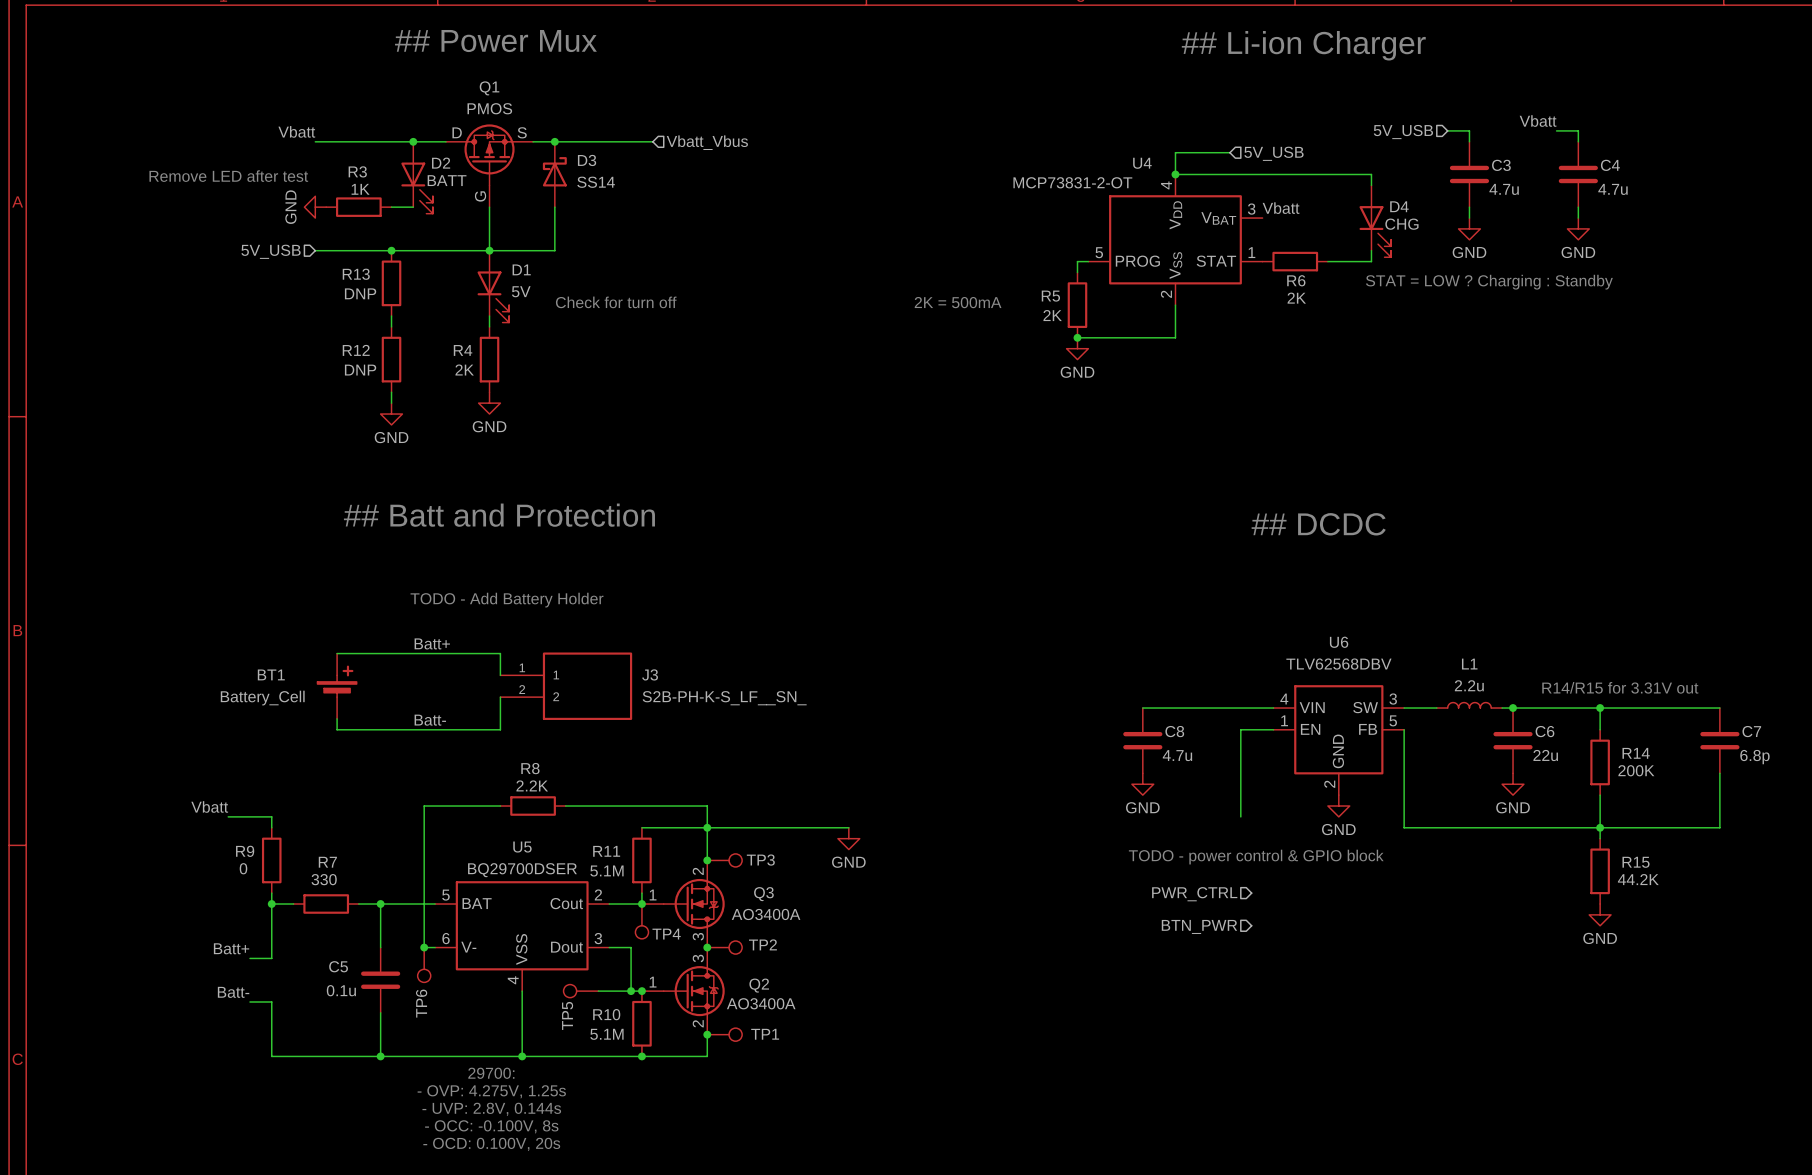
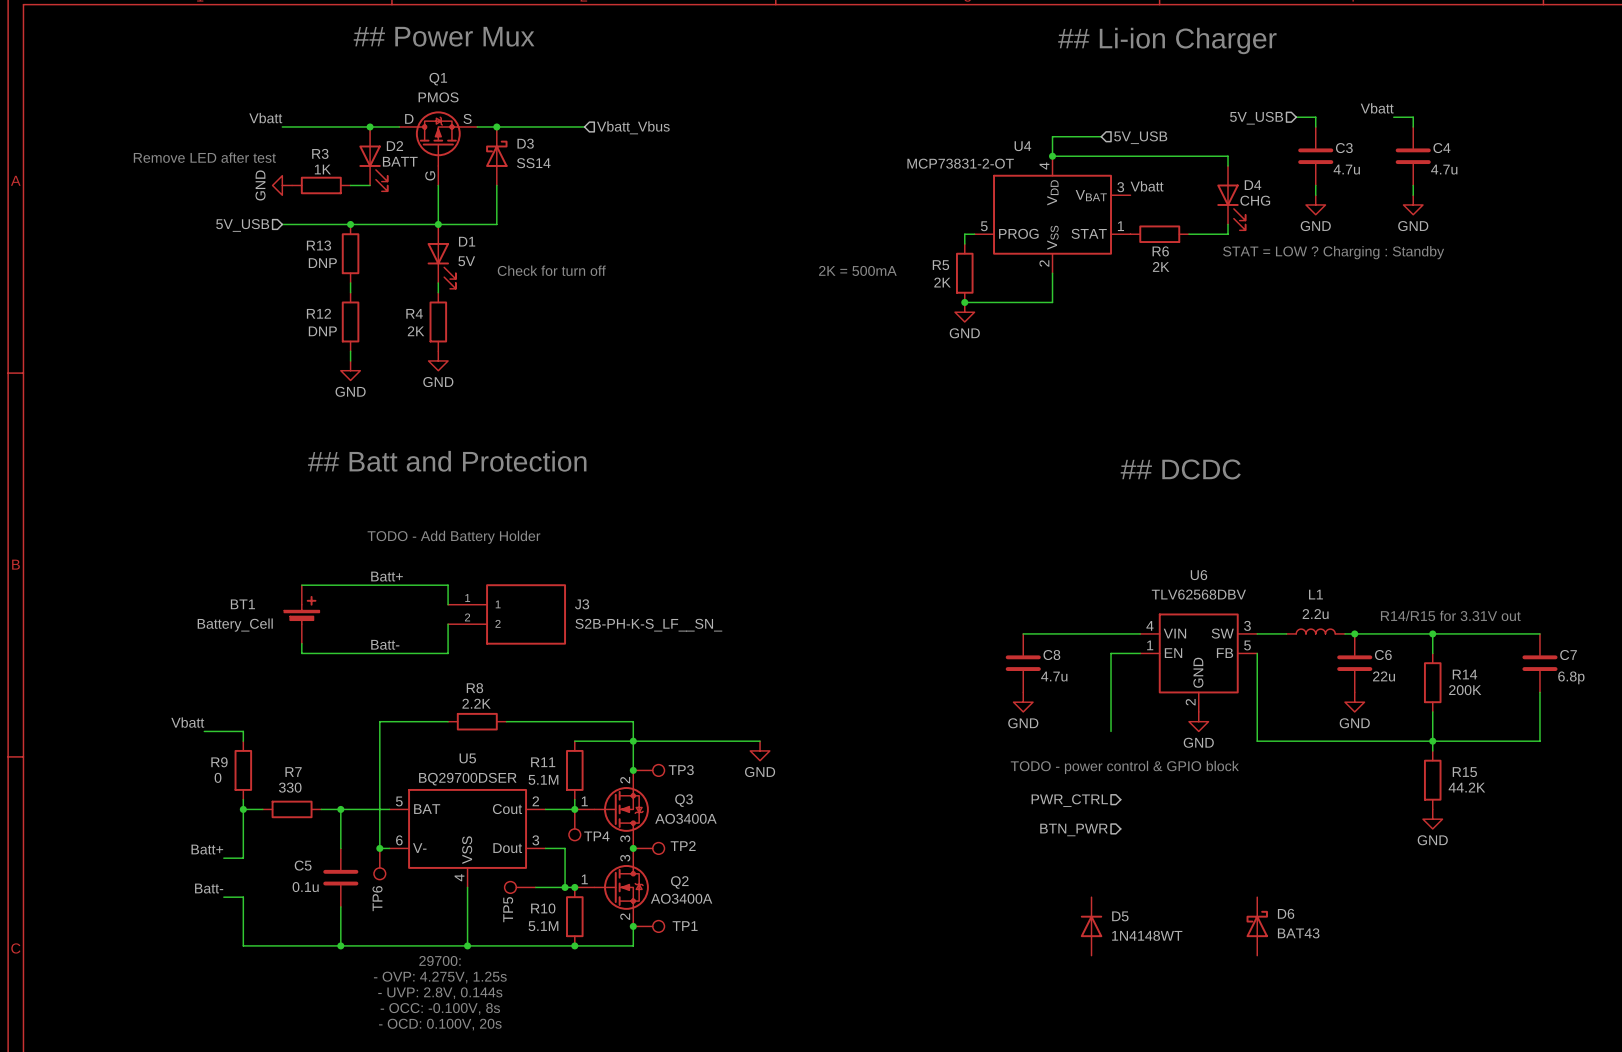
D5: none -> 1N4148WT (1091, 926)
D6: none -> BAT43 (1257, 926)

